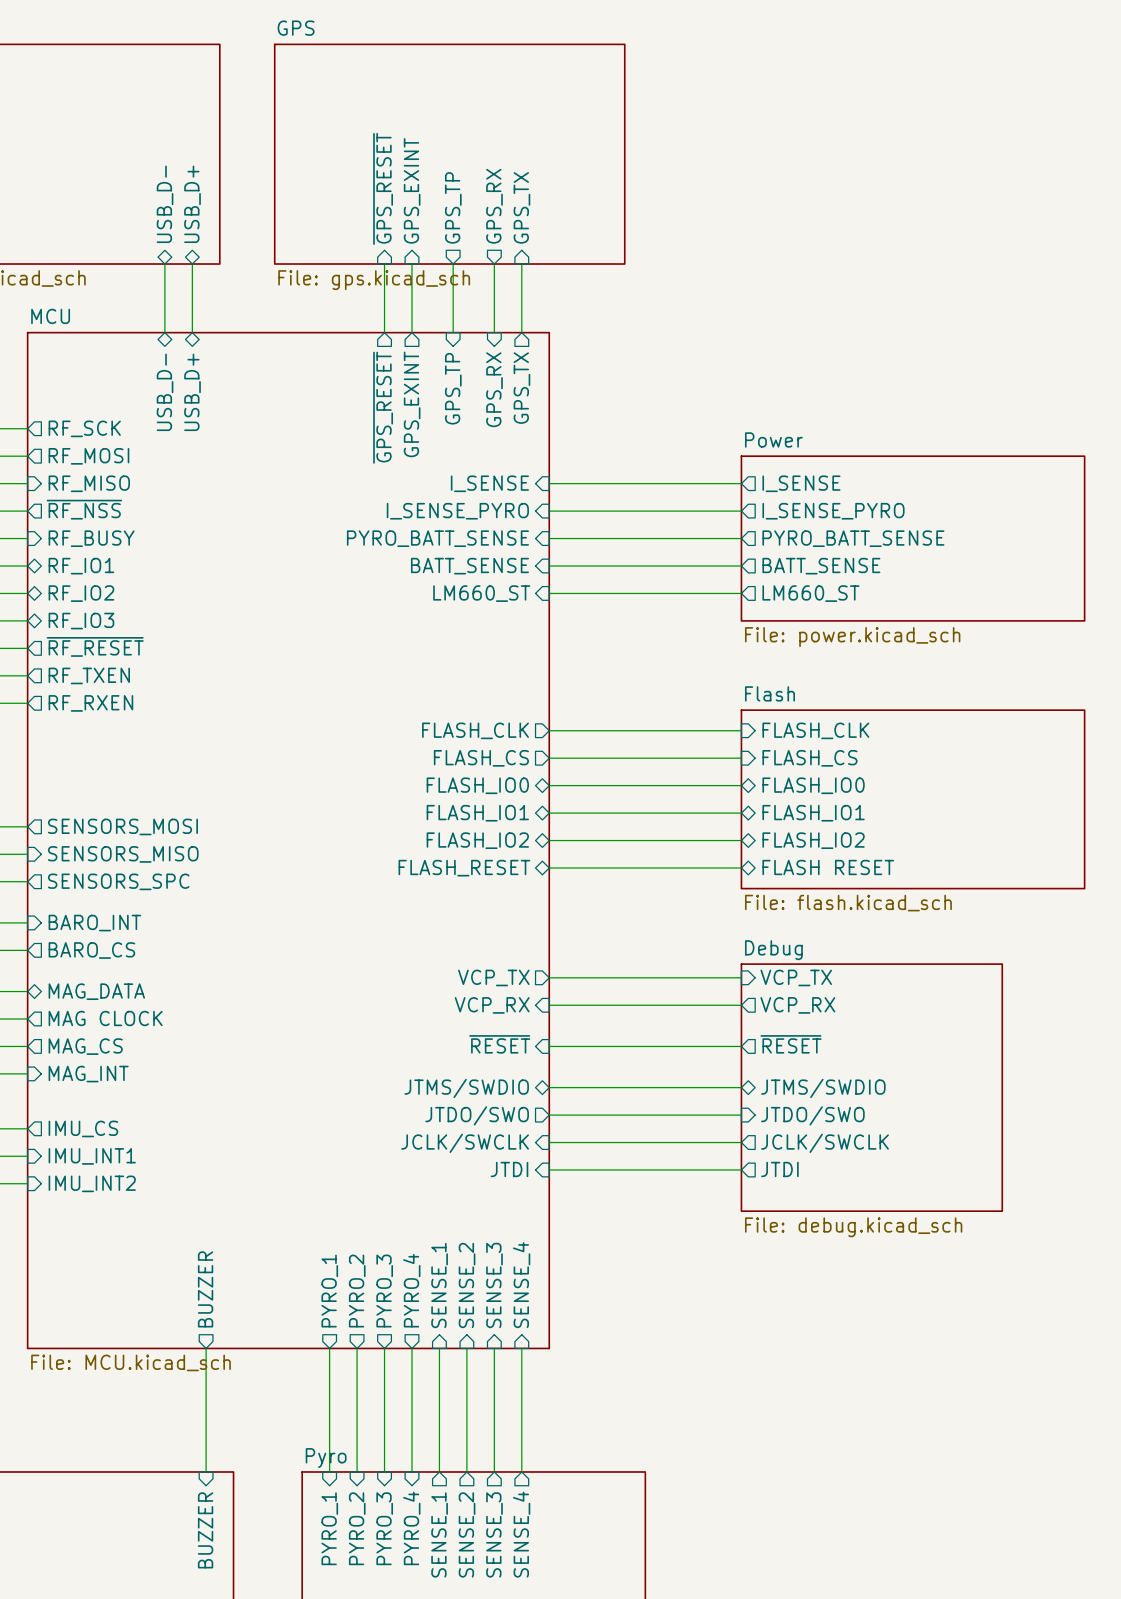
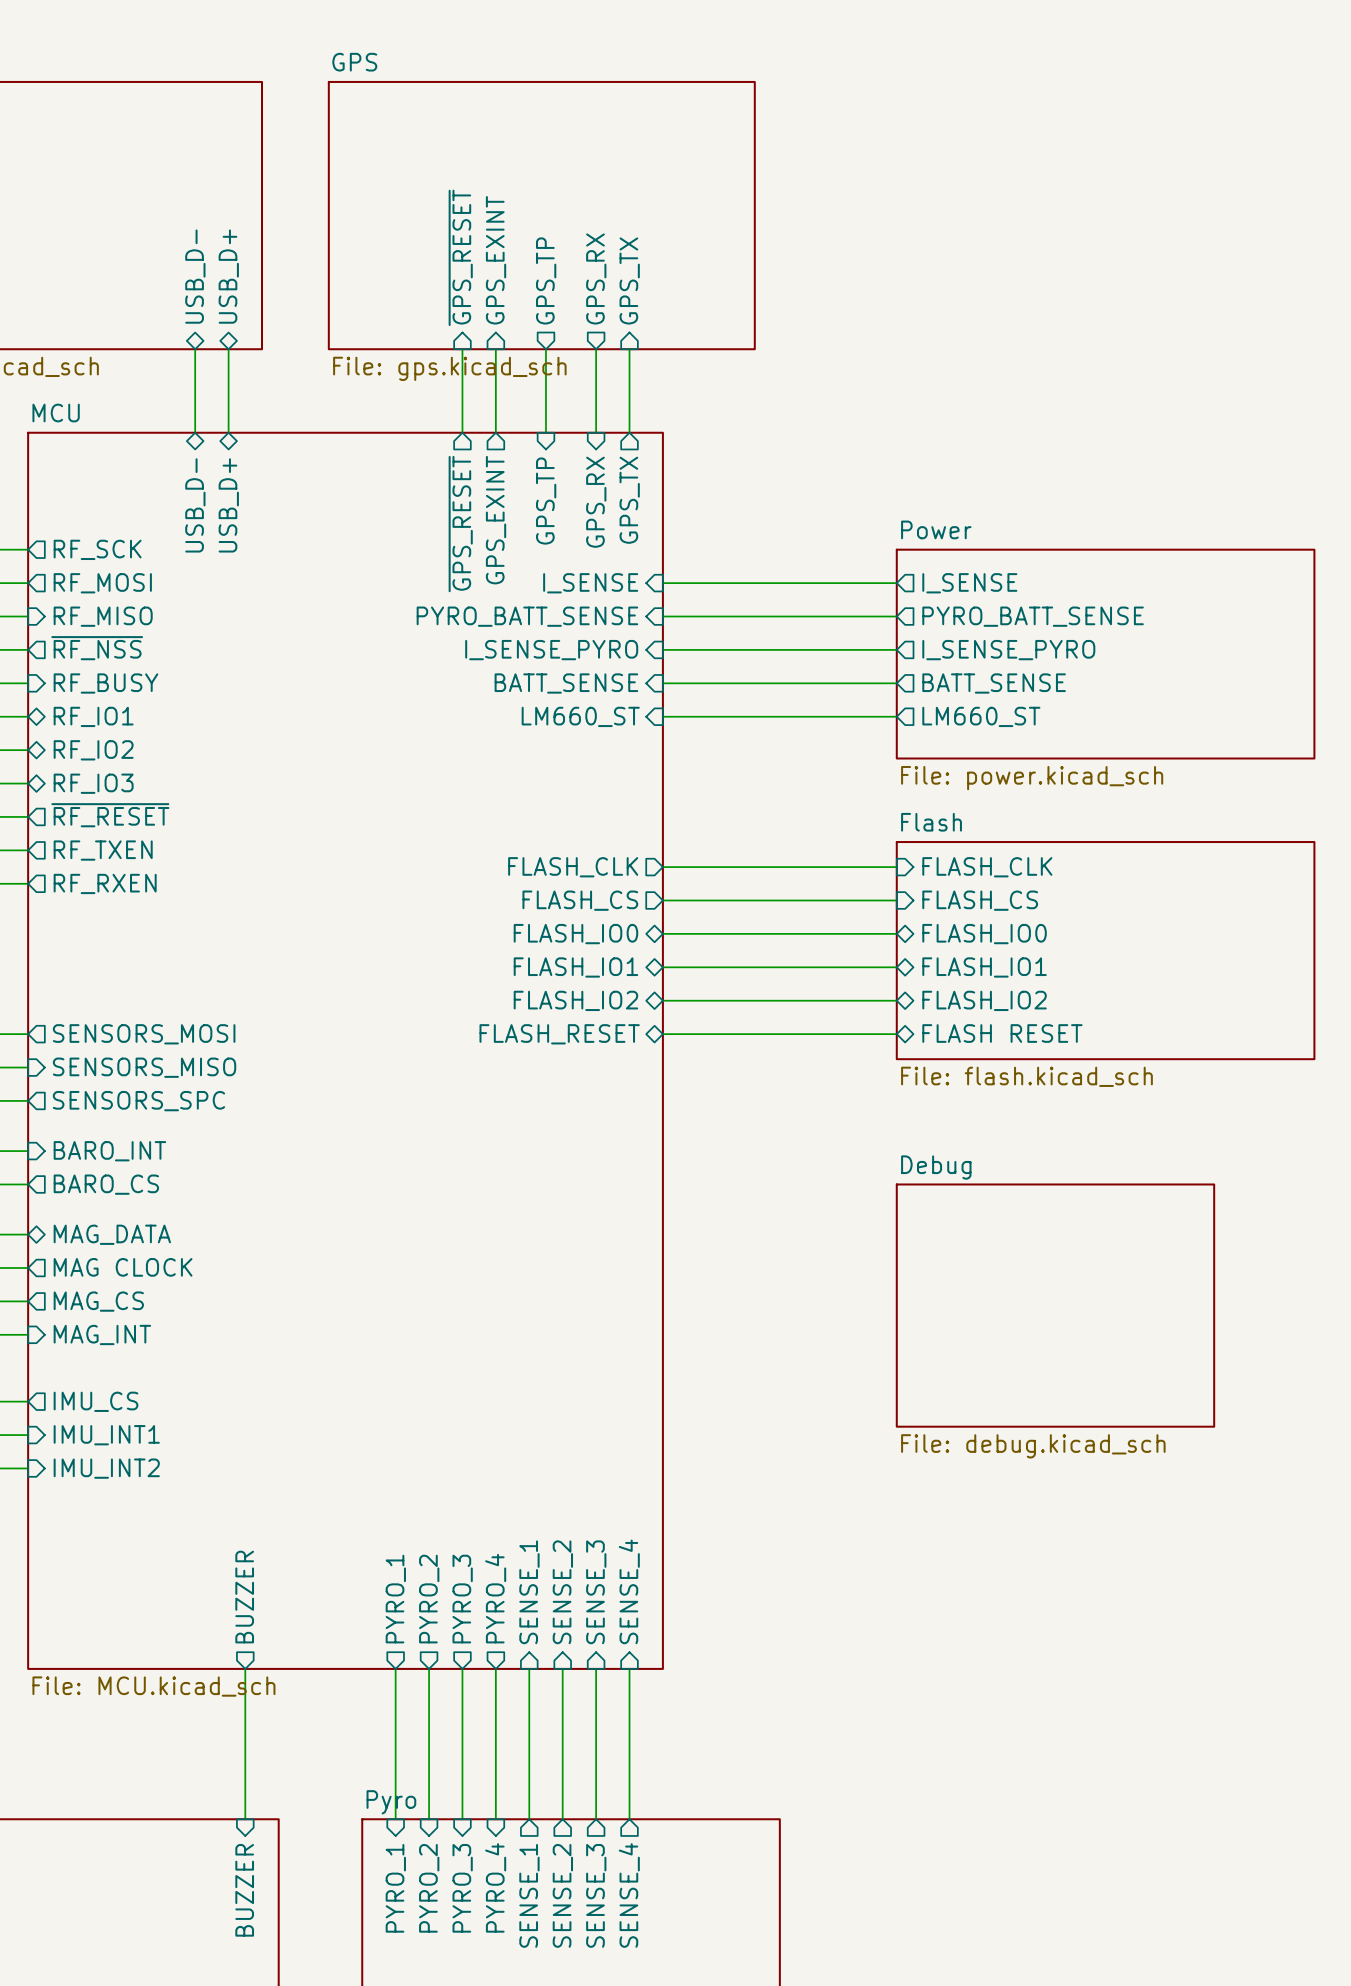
sheet pin: none -> I_SENSE (590, 583)
sheet pin: none -> I_SENSE (969, 583)
sheet pin: I_SENSE (489, 483) -> PYRO_BATT_SENSE (527, 616)
sheet pin: I_SENSE (801, 483) -> PYRO_BATT_SENSE (1033, 616)
sheet Power: none -> File: power.kicad_sch (1105, 654)
sheet pin: PYRO_BATT_SENSE (437, 538) -> BATT_SENSE (566, 683)
sheet pin: PYRO_BATT_SENSE (853, 538) -> BATT_SENSE (994, 683)
sheet Power: File: power.kicad_sch (913, 538) -> none
sheet pin: BATT_SENSE (469, 566) -> LM660_ST (580, 716)
sheet pin: BATT_SENSE (821, 566) -> LM660_ST (981, 716)
sheet pin: LM660_ST (481, 593) -> none
wire: (549, 593) (741, 593) -> (662, 583) (896, 583)
sheet pin: LM660_ST (810, 593) -> none
sheet pin position: FLASH_CLK (475, 730) -> FLASH_CLK (573, 867)
wire: (549, 730) (741, 730) -> (662, 867) (896, 867)
sheet pin position: FLASH_CLK (815, 730) -> FLASH_CLK (987, 867)
sheet pin position: FLASH_CS (481, 758) -> FLASH_CS (580, 900)
wire: (549, 758) (741, 758) -> (662, 900) (896, 900)
sheet pin position: FLASH_CS (809, 758) -> FLASH_CS (980, 900)
sheet pin position: FLASH_IO0 (477, 785) -> FLASH_IO0 (575, 934)
wire: (549, 785) (741, 785) -> (662, 933) (896, 933)
sheet pin position: FLASH_IO0 (813, 785) -> FLASH_IO0 (984, 934)
sheet Flash position: (913, 799) -> (1105, 950)
sheet pin position: FLASH_IO1 (477, 813) -> FLASH_IO1 (575, 967)
wire: (549, 813) (741, 813) -> (662, 967) (896, 967)
sheet pin position: FLASH_IO1 (813, 813) -> FLASH_IO1 (984, 967)
sheet pin position: FLASH_IO2 (477, 840) -> FLASH_IO2 (575, 1000)
wire: (549, 840) (741, 840) -> (662, 1000) (896, 1000)
sheet pin position: FLASH_IO2 (813, 840) -> FLASH_IO2 (984, 1000)
sheet pin position: FLASH RESET (828, 867) -> FLASH RESET (1002, 1033)
sheet pin position: FLASH_RESET (464, 868) -> FLASH_RESET (559, 1034)
wire: (549, 868) (741, 868) -> (662, 1034) (896, 1034)
sheet pin: VCP_TX (493, 977) -> none
wire: (549, 977) (741, 977) -> none
sheet pin: VCP_TX (796, 977) -> none
sheet pin: VCP_RX (492, 1005) -> none
wire: (549, 1005) (741, 1005) -> none
sheet pin: VCP_RX (797, 1005) -> none
sheet pin: ~{RESET} (499, 1044) -> none
sheet pin: ~{RESET} (791, 1044) -> none
wire: (549, 1046) (741, 1046) -> none
sheet Debug: none -> File: debug.kicad_sch (1055, 1305)
wire: (549, 1087) (741, 1087) -> none
sheet Debug: File: debug.kicad_sch (871, 1087) -> none
sheet pin: JTMS/SWDIO (466, 1088) -> none
sheet pin: JTMS/SWDIO (823, 1088) -> none
sheet pin: JTDO/SWO (477, 1115) -> none
wire: (549, 1115) (741, 1115) -> none
sheet pin: JTDO/SWO (812, 1115) -> none
wire: (549, 1142) (741, 1142) -> none
sheet pin: JCLK/SWCLK (465, 1143) -> none
sheet pin: JCLK/SWCLK (825, 1143) -> none
sheet pin: JTDI (509, 1169) -> none
wire: (549, 1169) (741, 1169) -> none
sheet pin: JTDI (779, 1169) -> none

